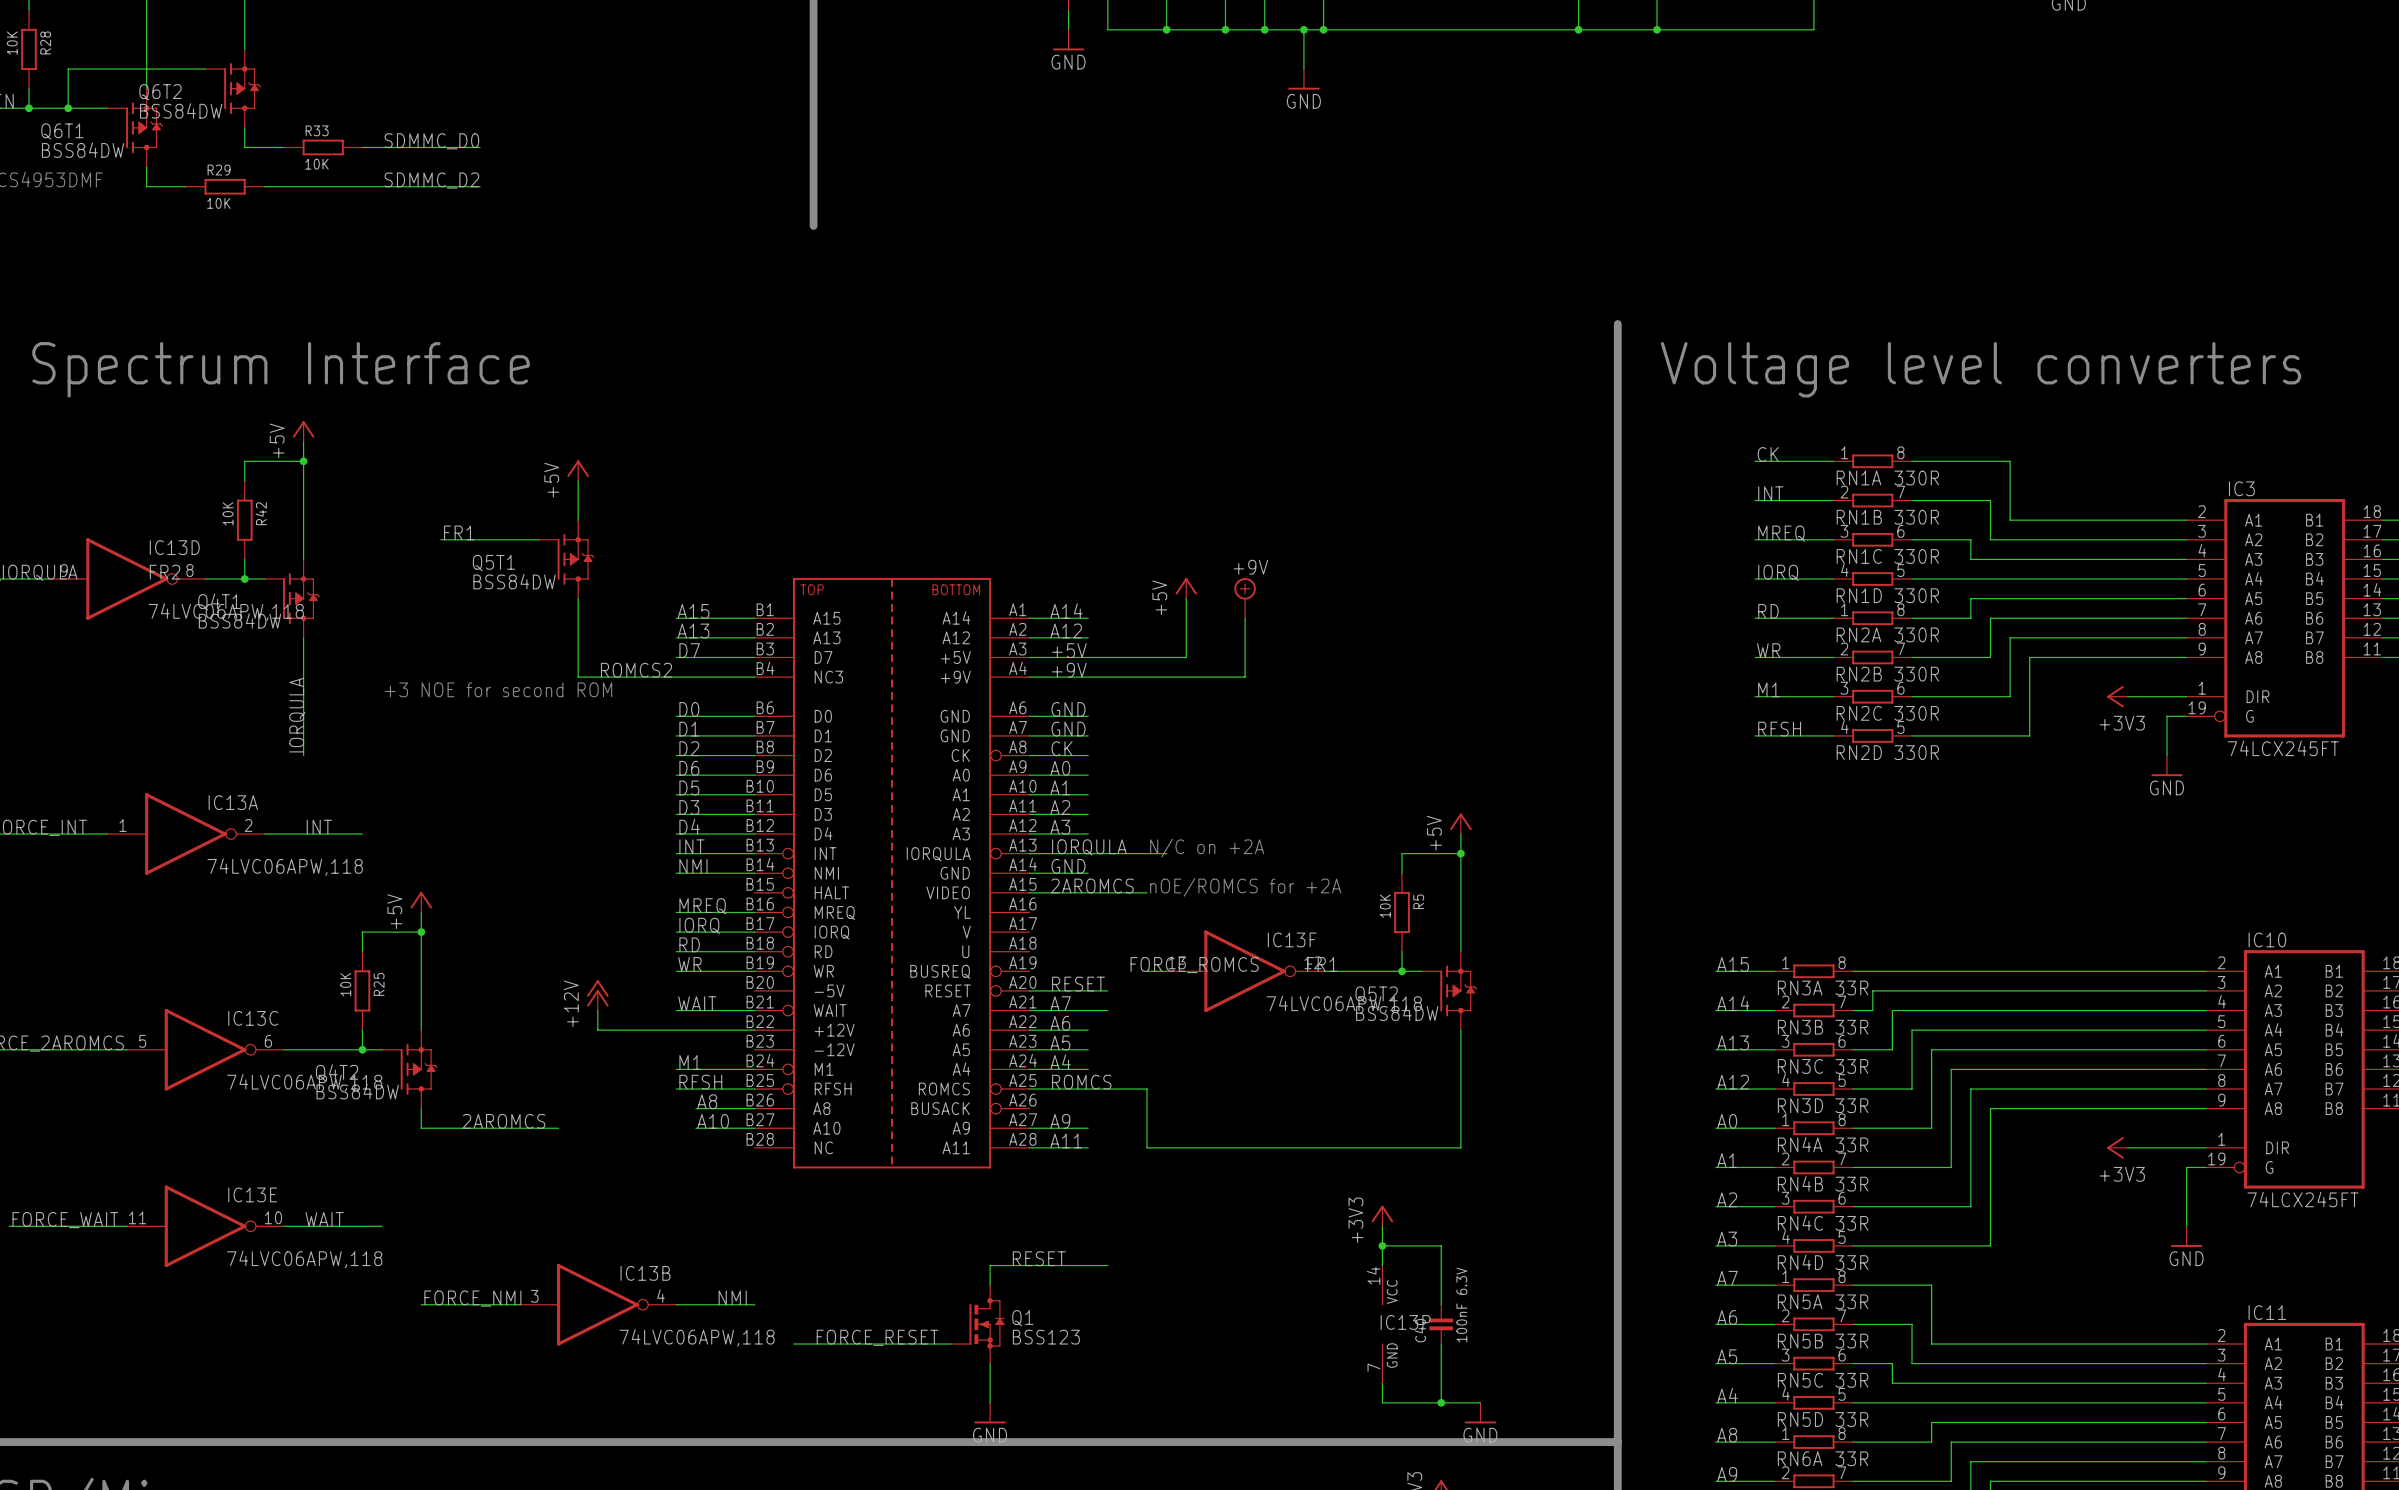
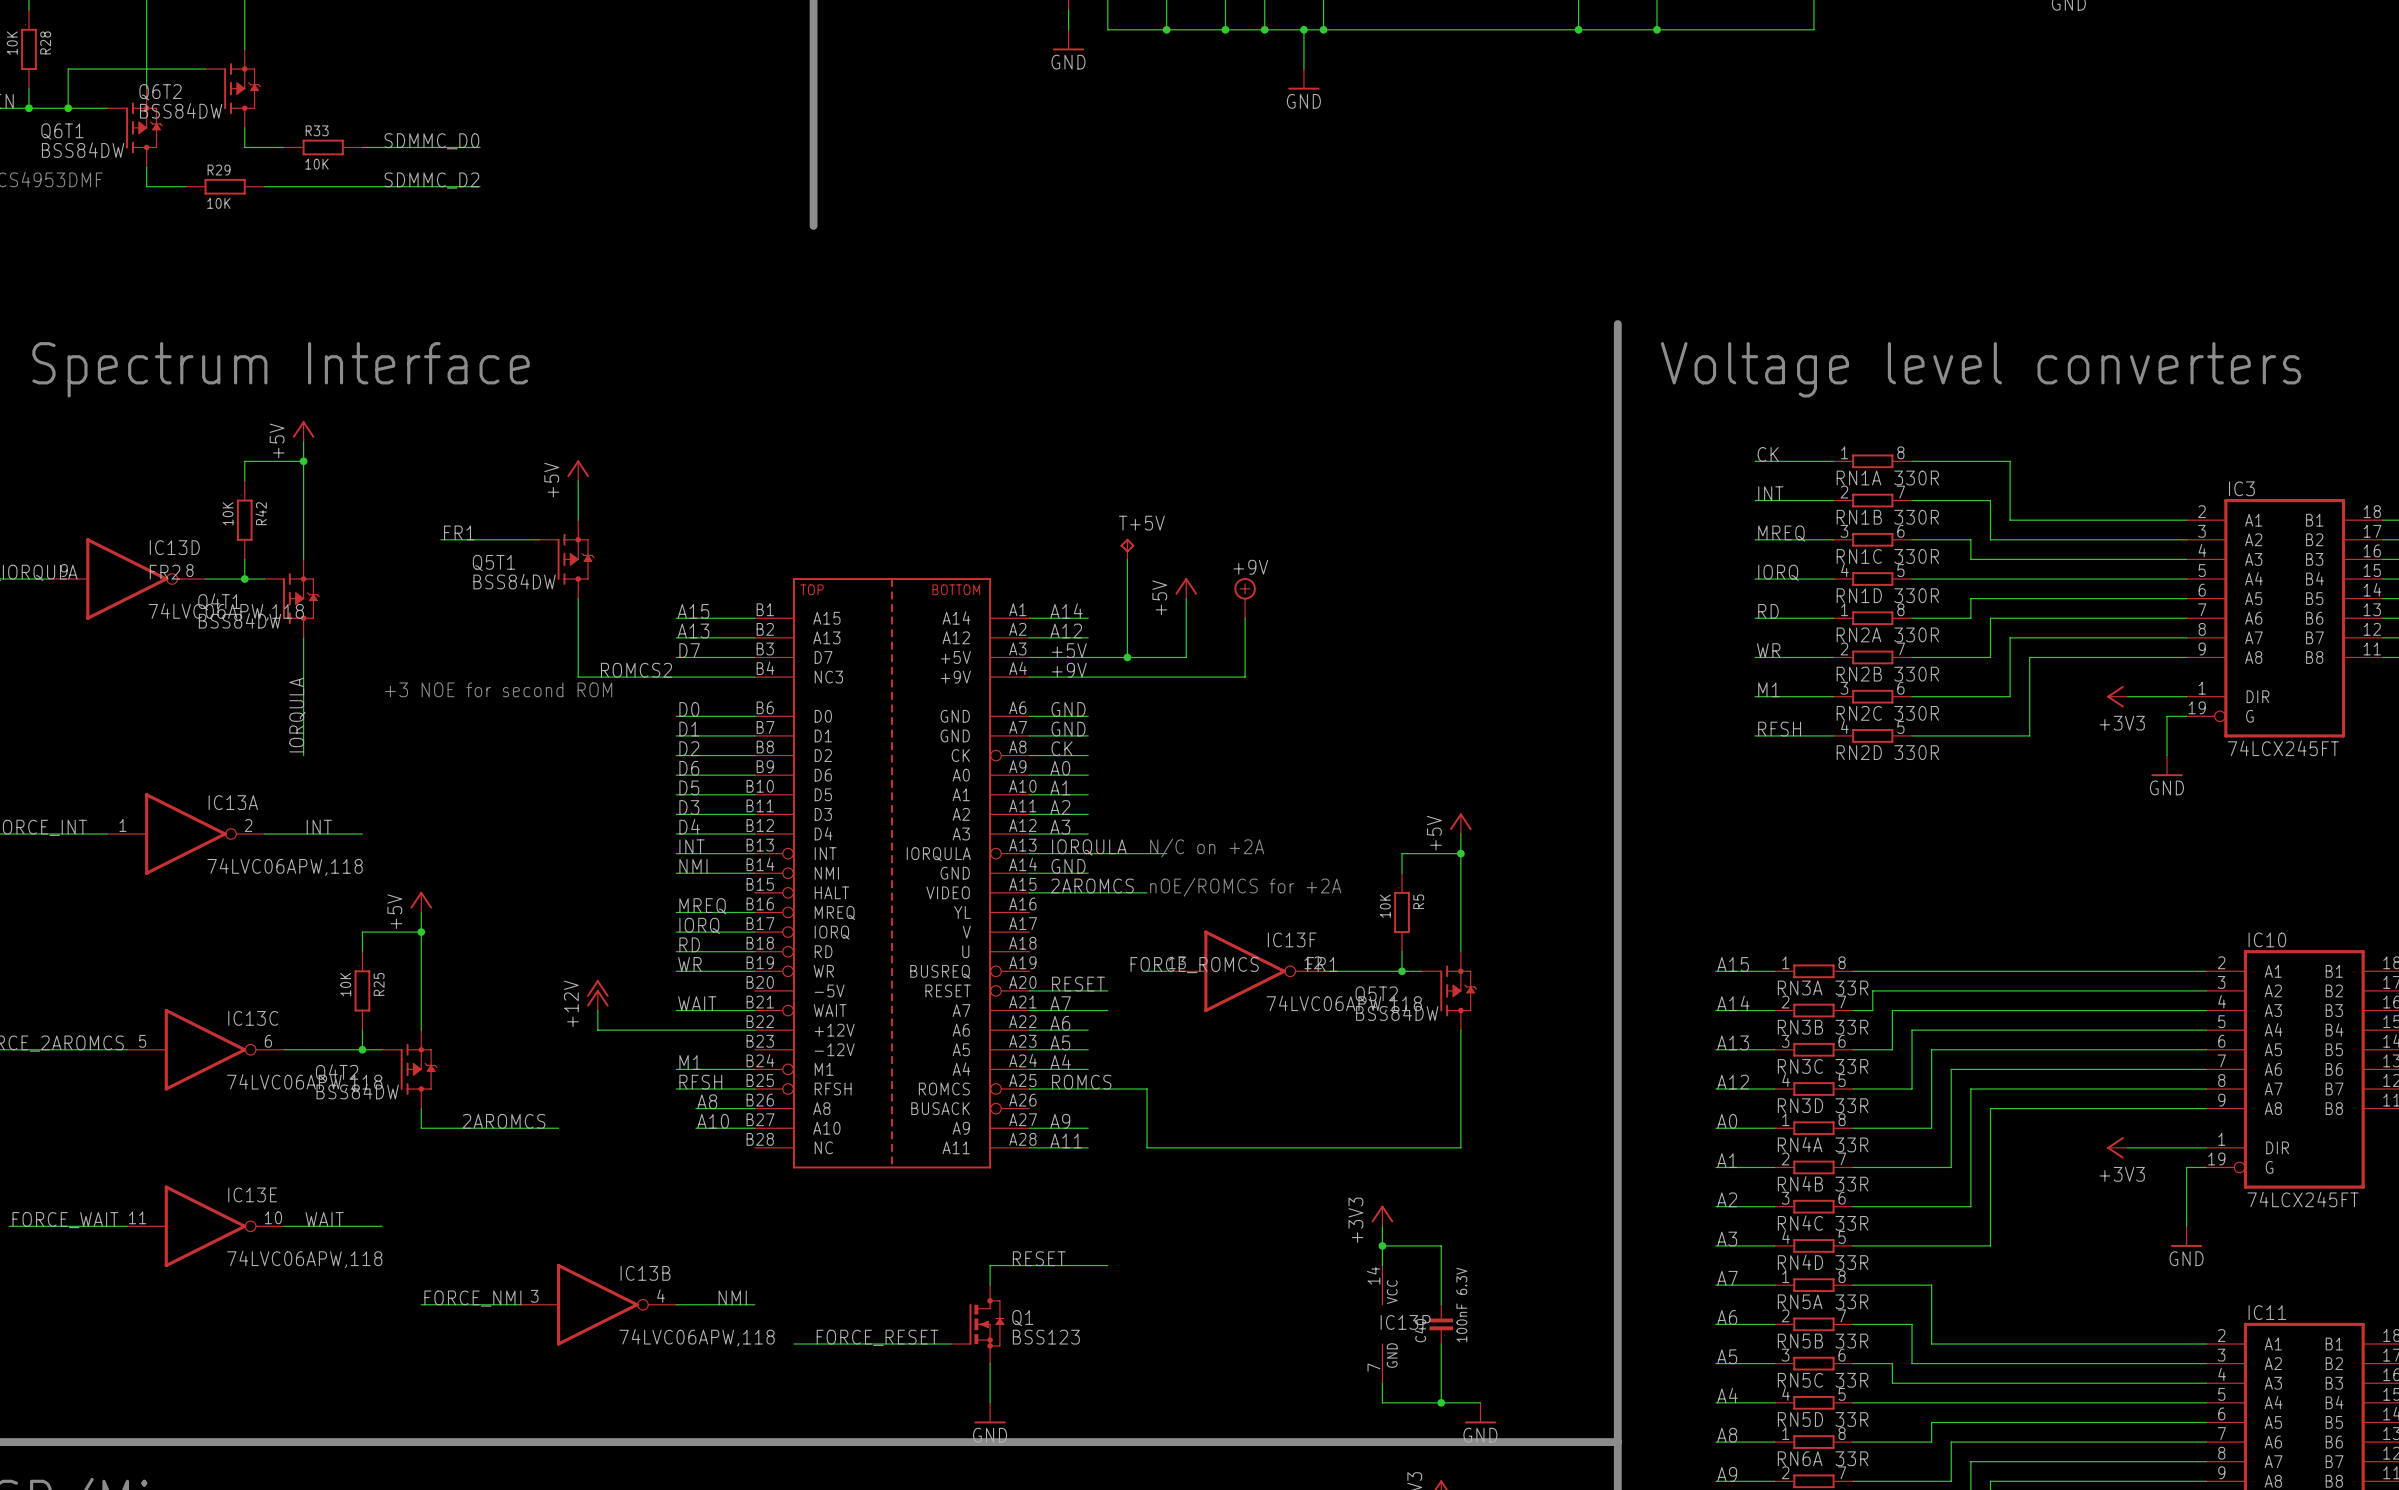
T+5V: none -> (1127, 549)
wire: none -> (1127, 559) (1127, 657)
junction: none -> (1127, 657)

